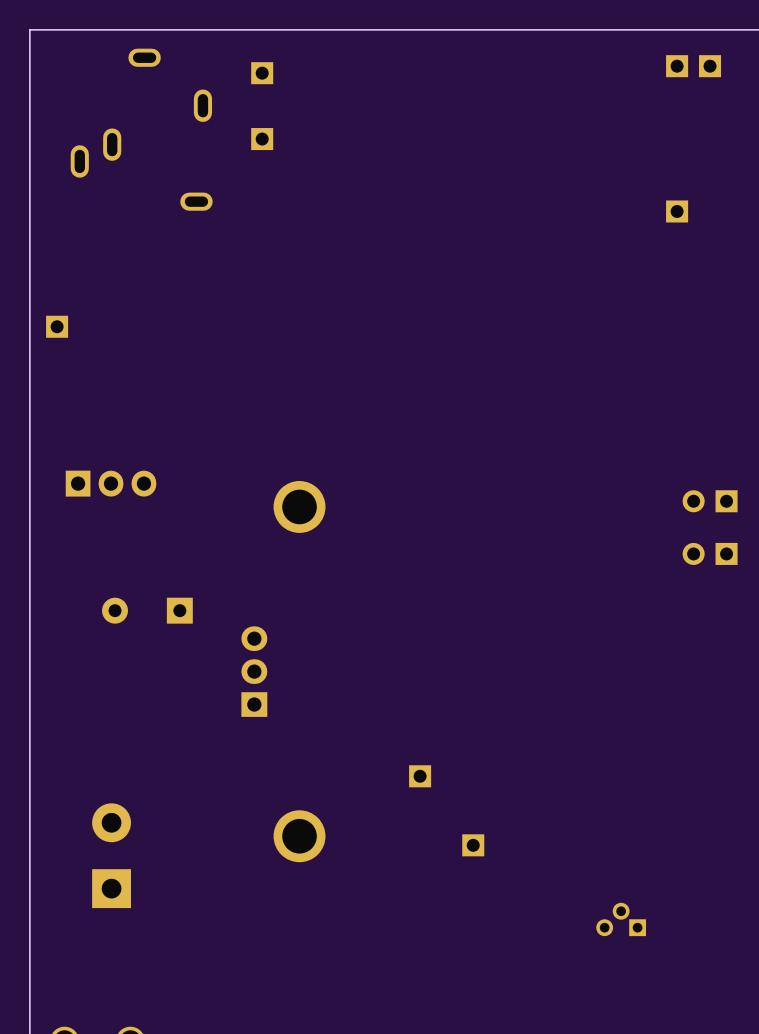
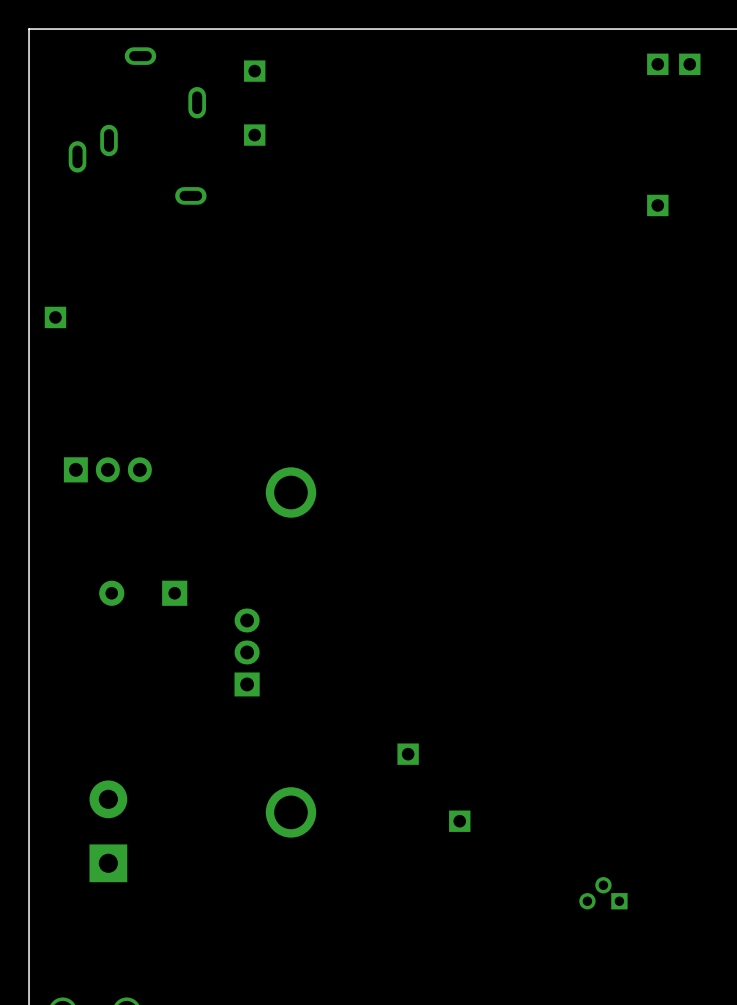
part: (710, 501) -> none
part: (710, 553) -> none

